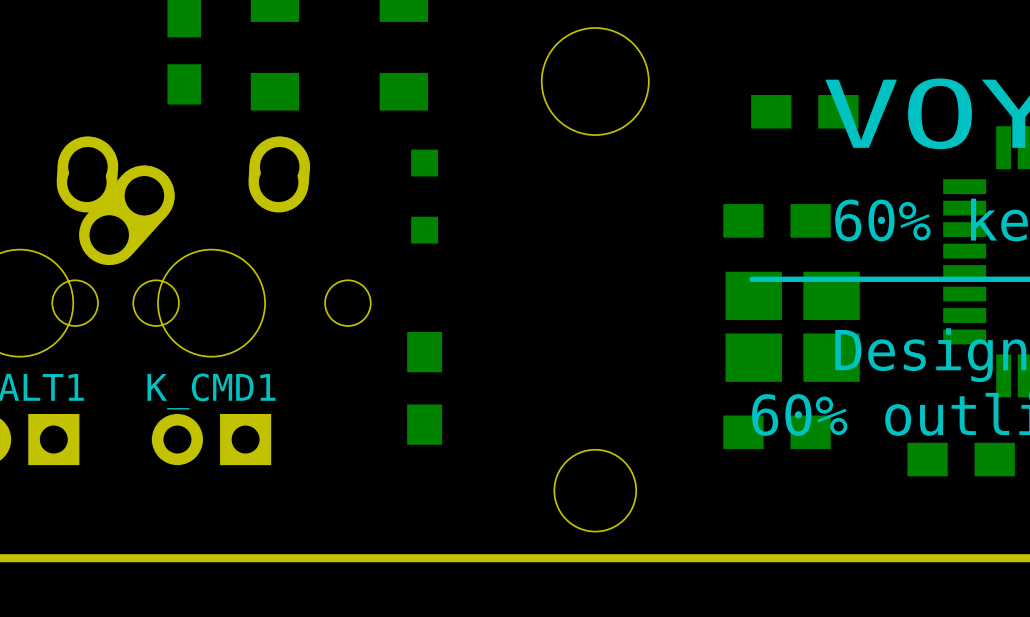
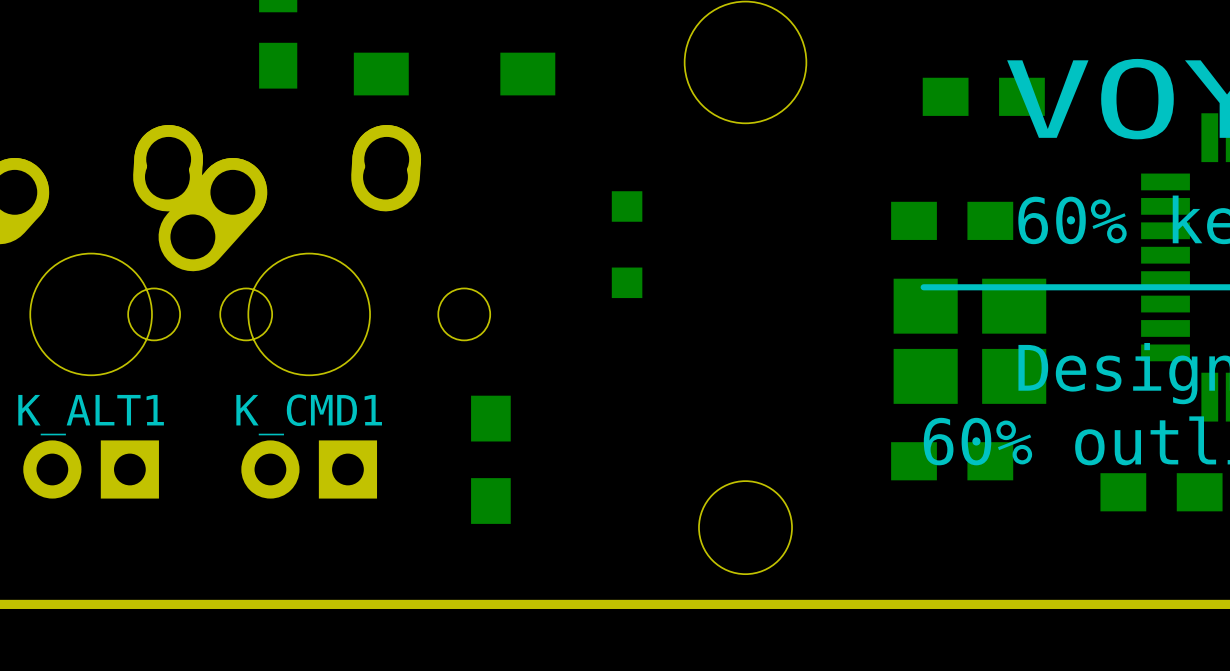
part position: (424, 196) -> (627, 244)
part position: (424, 388) -> (490, 459)

